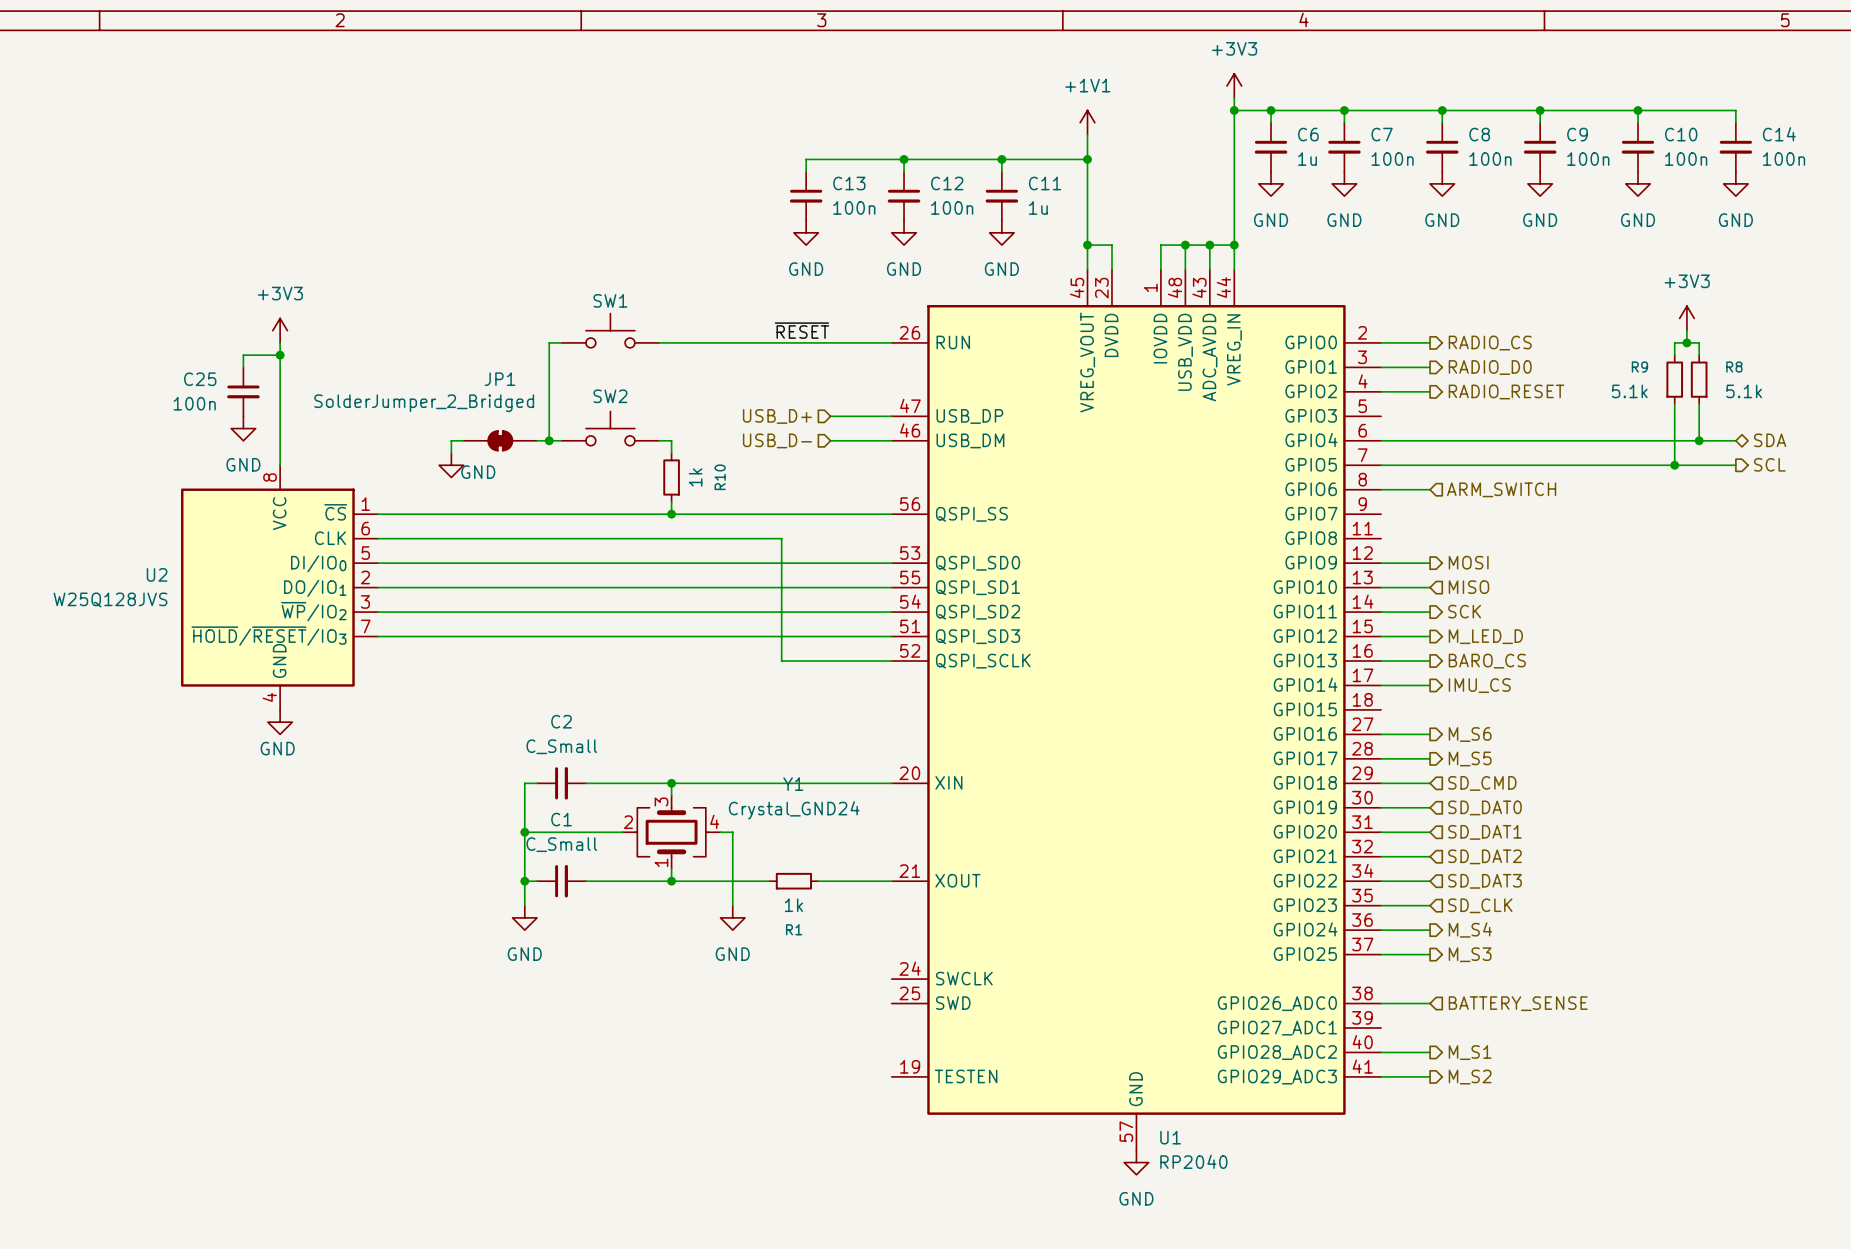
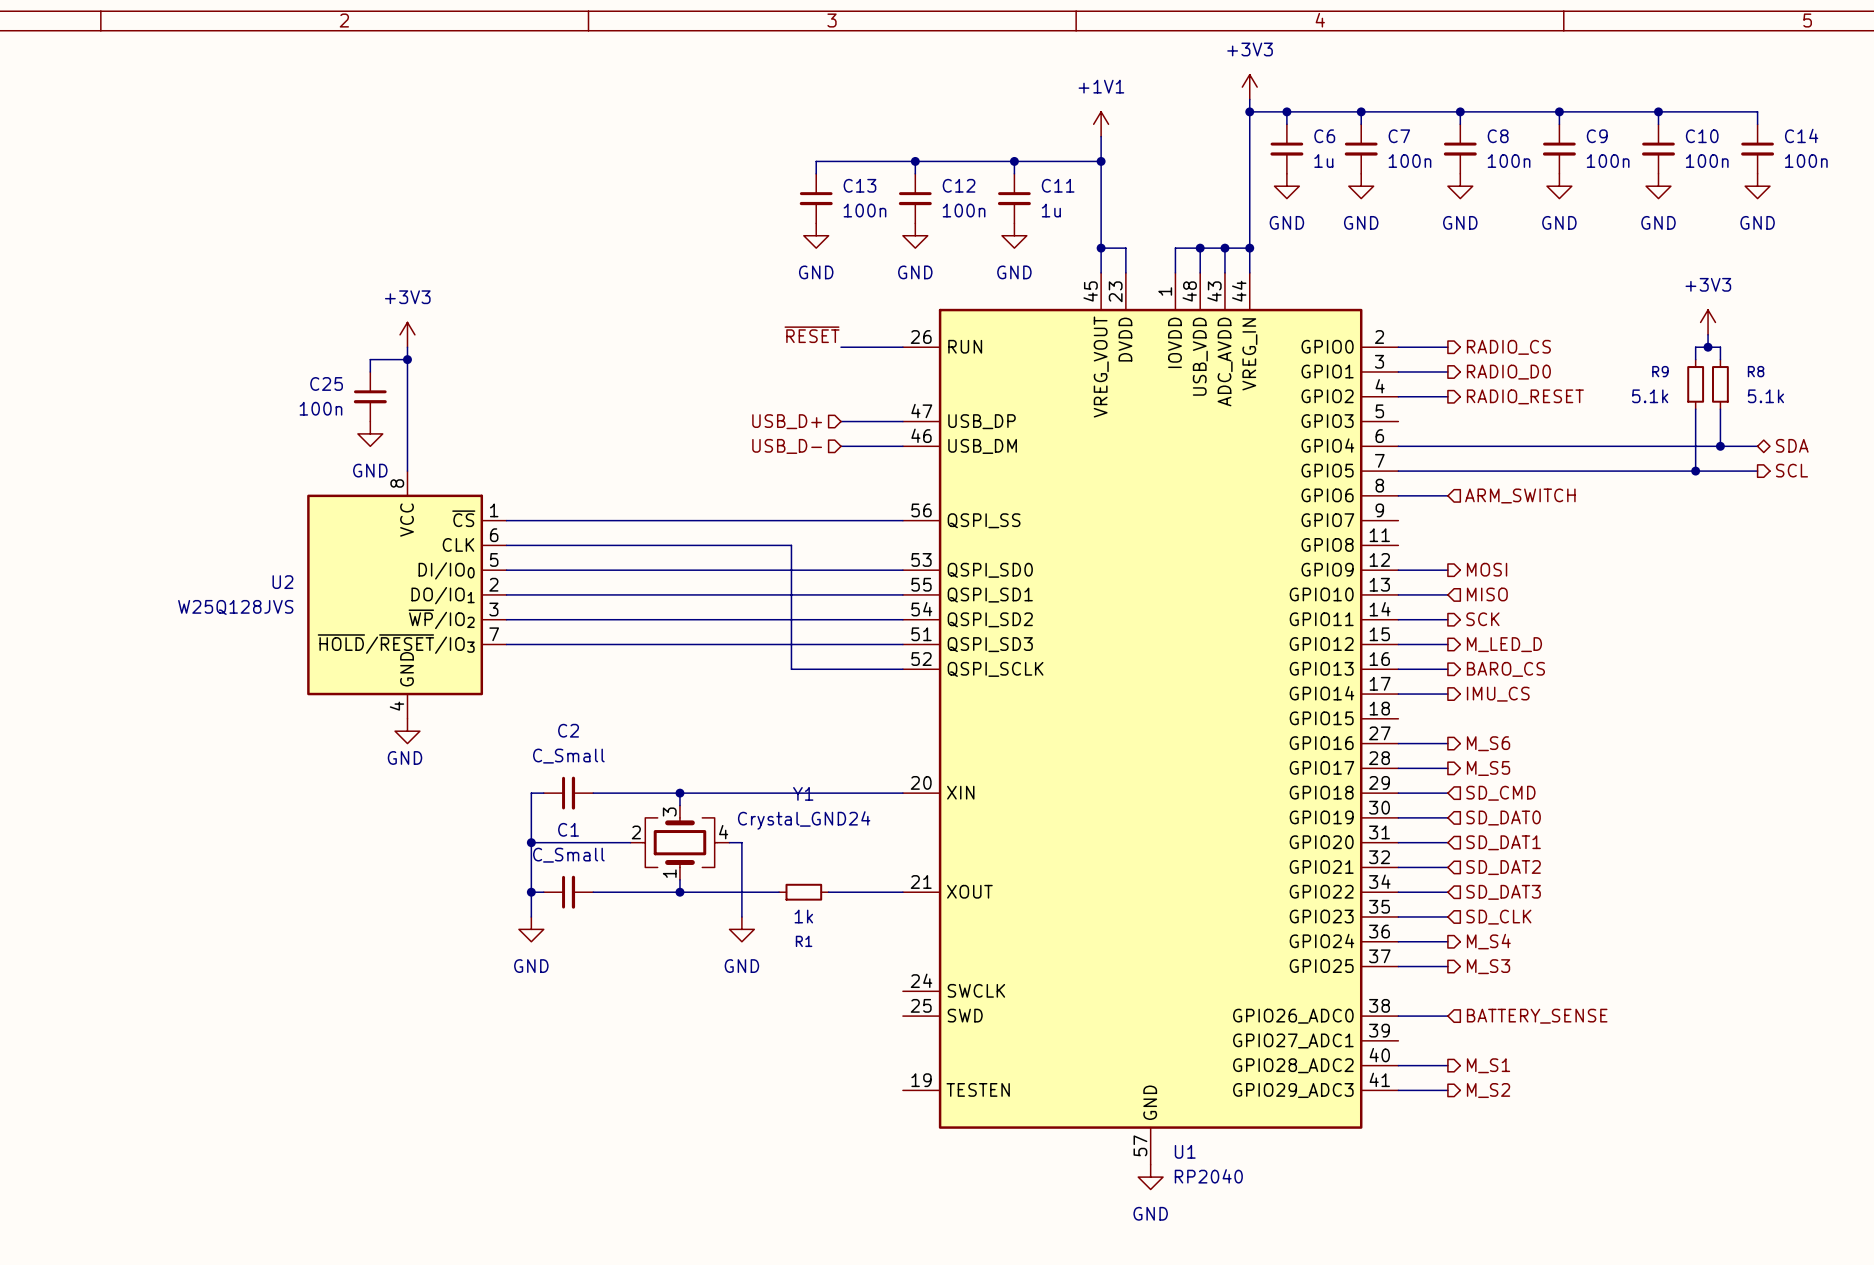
power symbol position: +3V3 (280, 330) -> +3V3 (407, 334)
SW1: (610, 330) -> none
wire: (280, 342) (280, 465) -> (407, 347) (407, 471)
wire: (561, 342) (549, 342) (549, 440) -> none
wire: (659, 342) (830, 342) -> none
wire: (280, 355) (243, 355) (243, 367) -> (407, 359) (370, 359) (370, 371)
junction: (280, 355) -> none
junction: none -> (407, 359)
C25 position: (243, 391) -> (370, 396)
power symbol: GND (243, 428) -> none
power symbol: none -> GND (370, 433)
SW2: (610, 428) -> none
wire: (463, 440) (451, 440) (451, 453) -> none
JP1: SolderJumper_2_Bridged (500, 440) -> none
wire: (537, 440) (561, 440) -> none
junction: (549, 440) -> none
wire: (659, 440) (671, 440) (671, 453) -> none
power symbol: GND (451, 465) -> none
R10: 1k (671, 477) -> none
wire: (671, 501) (671, 514) -> none
junction: (671, 514) -> none
U2 position: (279, 587) -> (406, 594)
power symbol position: GND (280, 722) -> GND (407, 731)

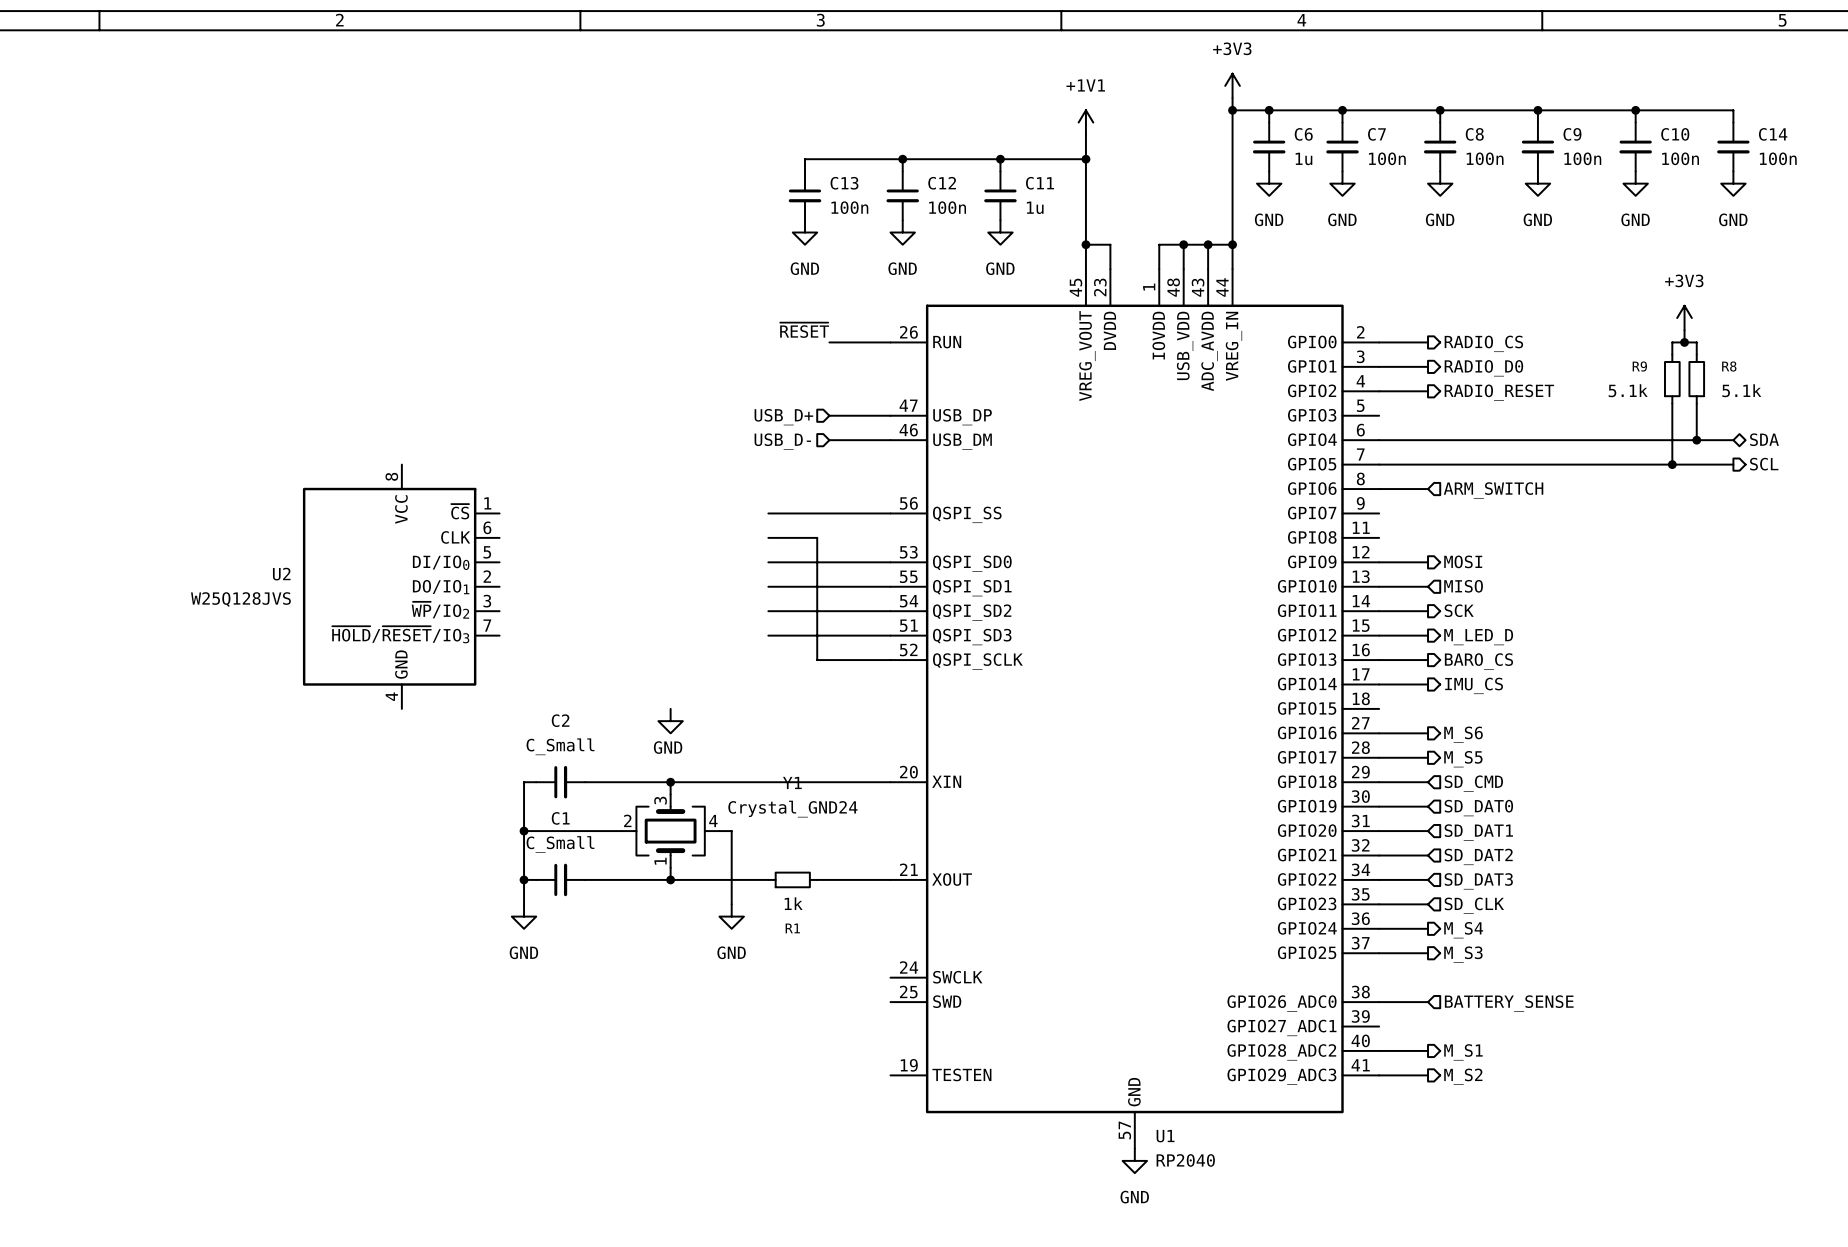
power symbol: +3V3 (407, 334) -> none
wire: (407, 347) (407, 471) -> none
wire: (407, 359) (370, 359) (370, 371) -> none
junction: (407, 359) -> none
C25: 100n (370, 396) -> none
power symbol: GND (370, 433) -> none
wire: (506, 520) (779, 520) -> none
wire: (506, 545) (779, 545) -> none
wire: (791, 545) (791, 669) (828, 669) -> (780, 537) (817, 537) (817, 660)
wire: (506, 570) (779, 570) -> none
wire: (506, 594) (779, 594) -> none
wire: (506, 619) (779, 619) -> none
wire: (506, 644) (779, 644) -> none
power symbol: GND (407, 731) -> none
power symbol: none -> GND (670, 721)

